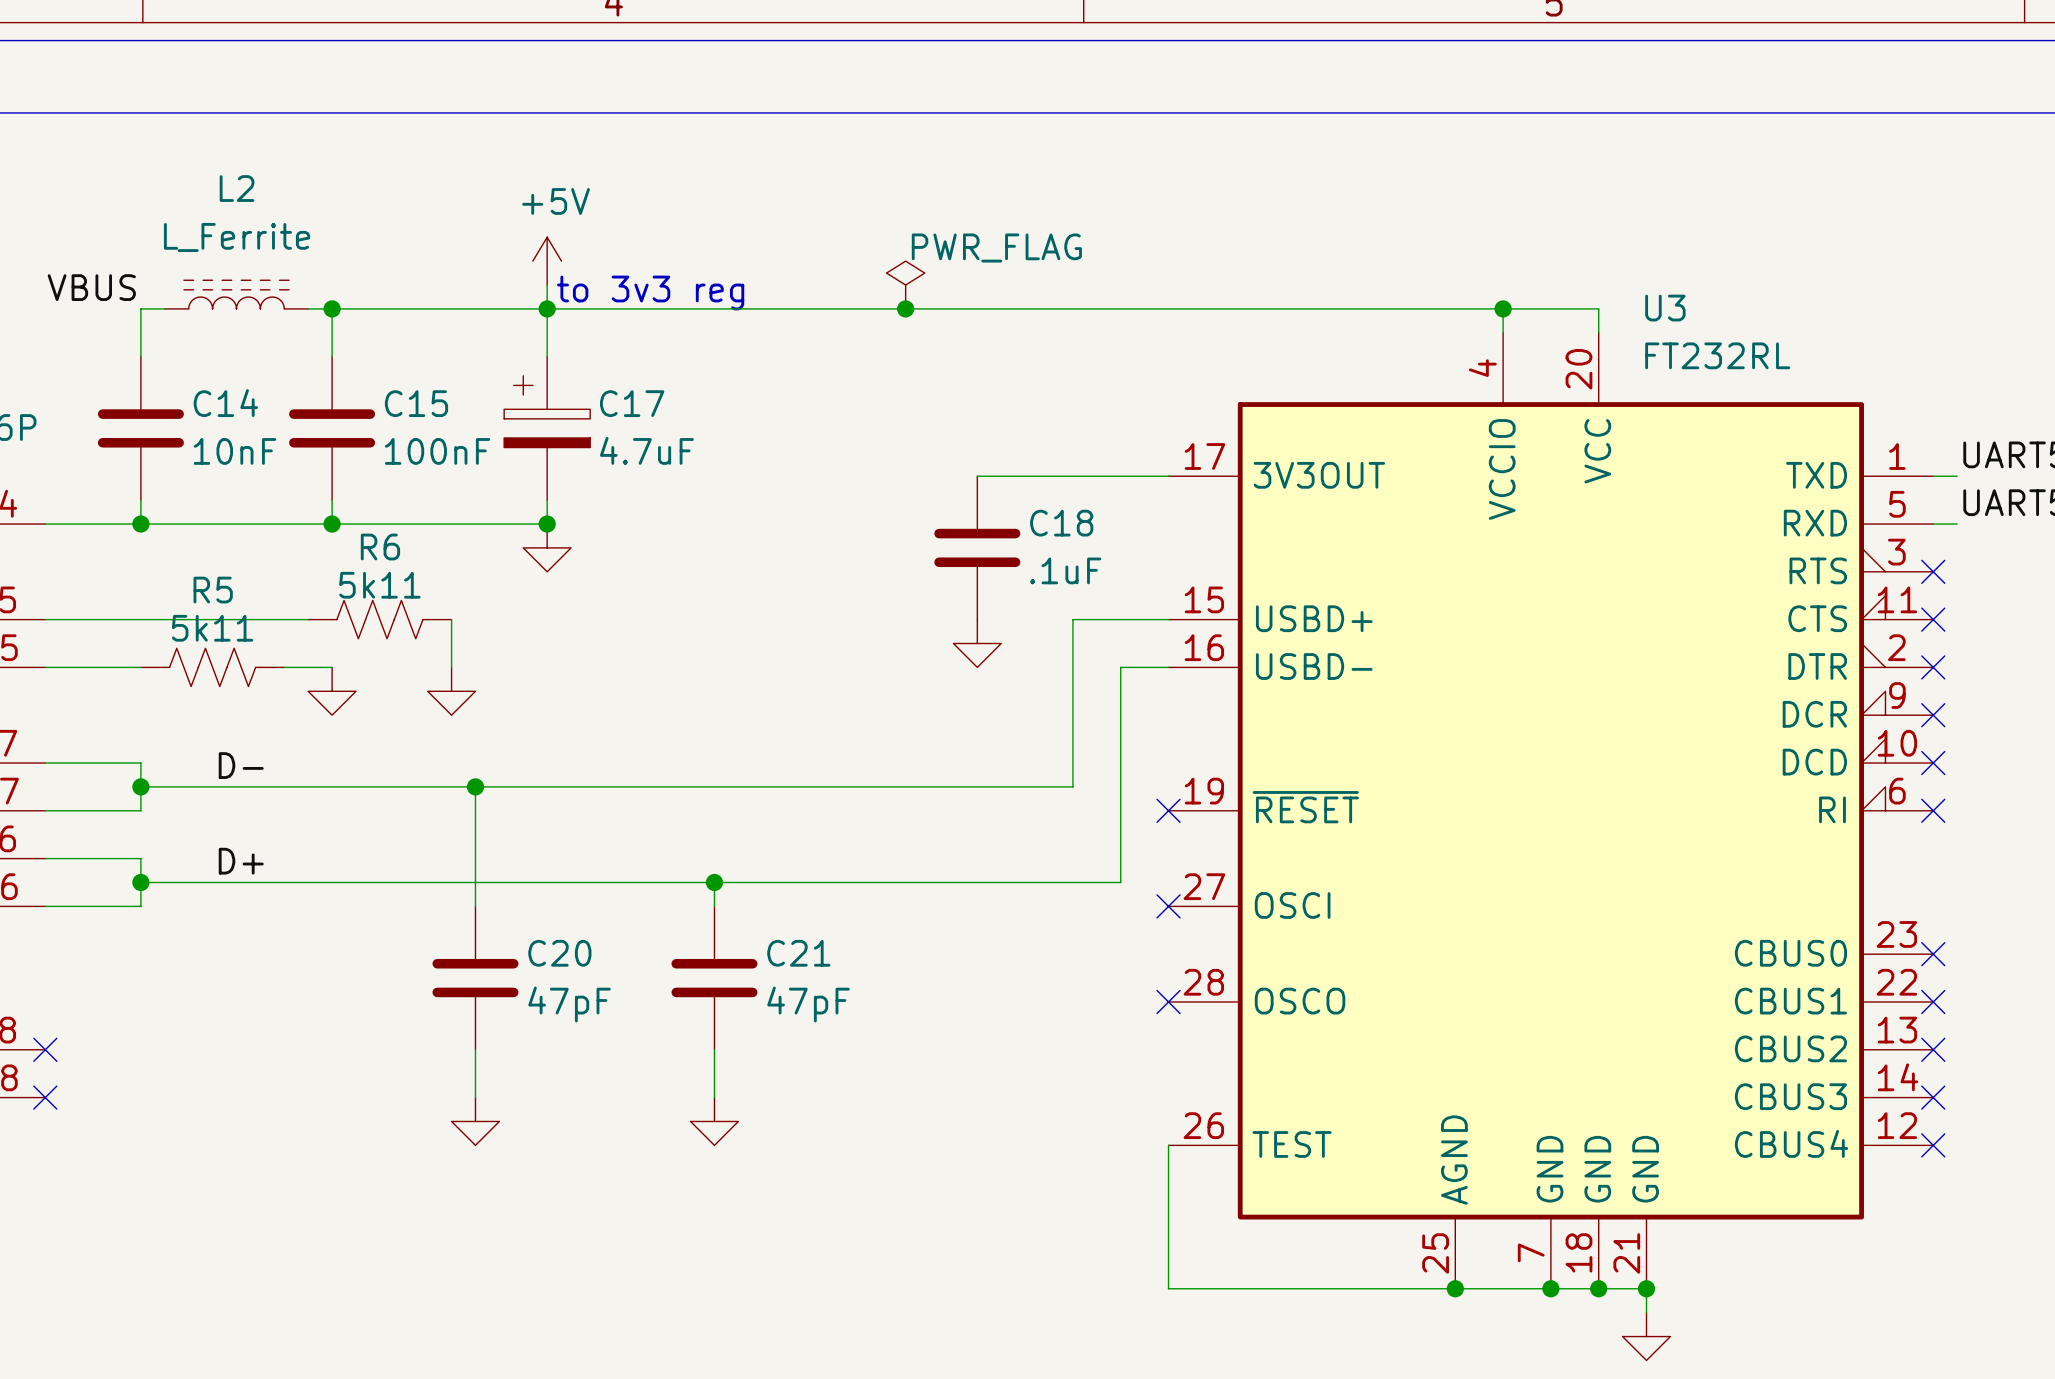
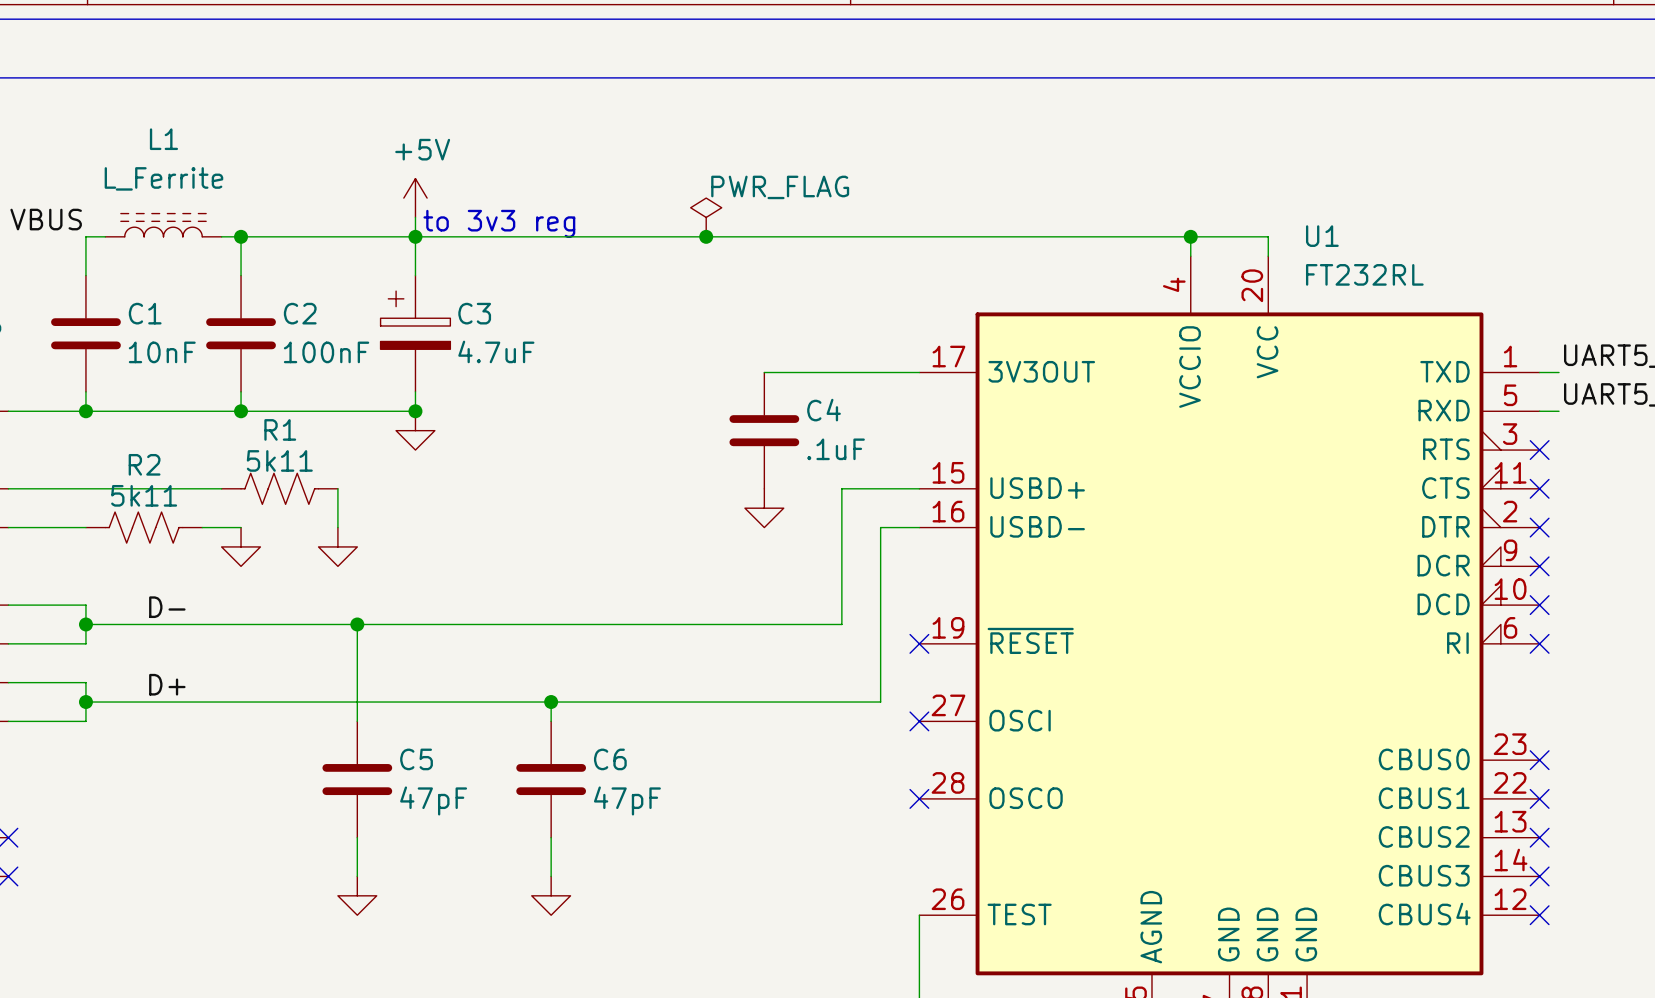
L2 name: L2 (237, 188) -> L1 (163, 139)
U3 name: U3 (1665, 308) -> U1 (1322, 236)
C14 name: C14 (225, 403) -> C1 (145, 313)
C15 name: C15 (416, 403) -> C2 (300, 313)
C17 name: C17 (632, 403) -> C3 (474, 313)
C18 name: C18 (1061, 523) -> C4 (824, 410)
R6 name: R6 (380, 547) -> R1 (280, 429)
R5 name: R5 (213, 590) -> R2 (144, 464)
C20 name: C20 (559, 953) -> C5 (416, 759)
C21 name: C21 (798, 953) -> C6 (610, 759)

